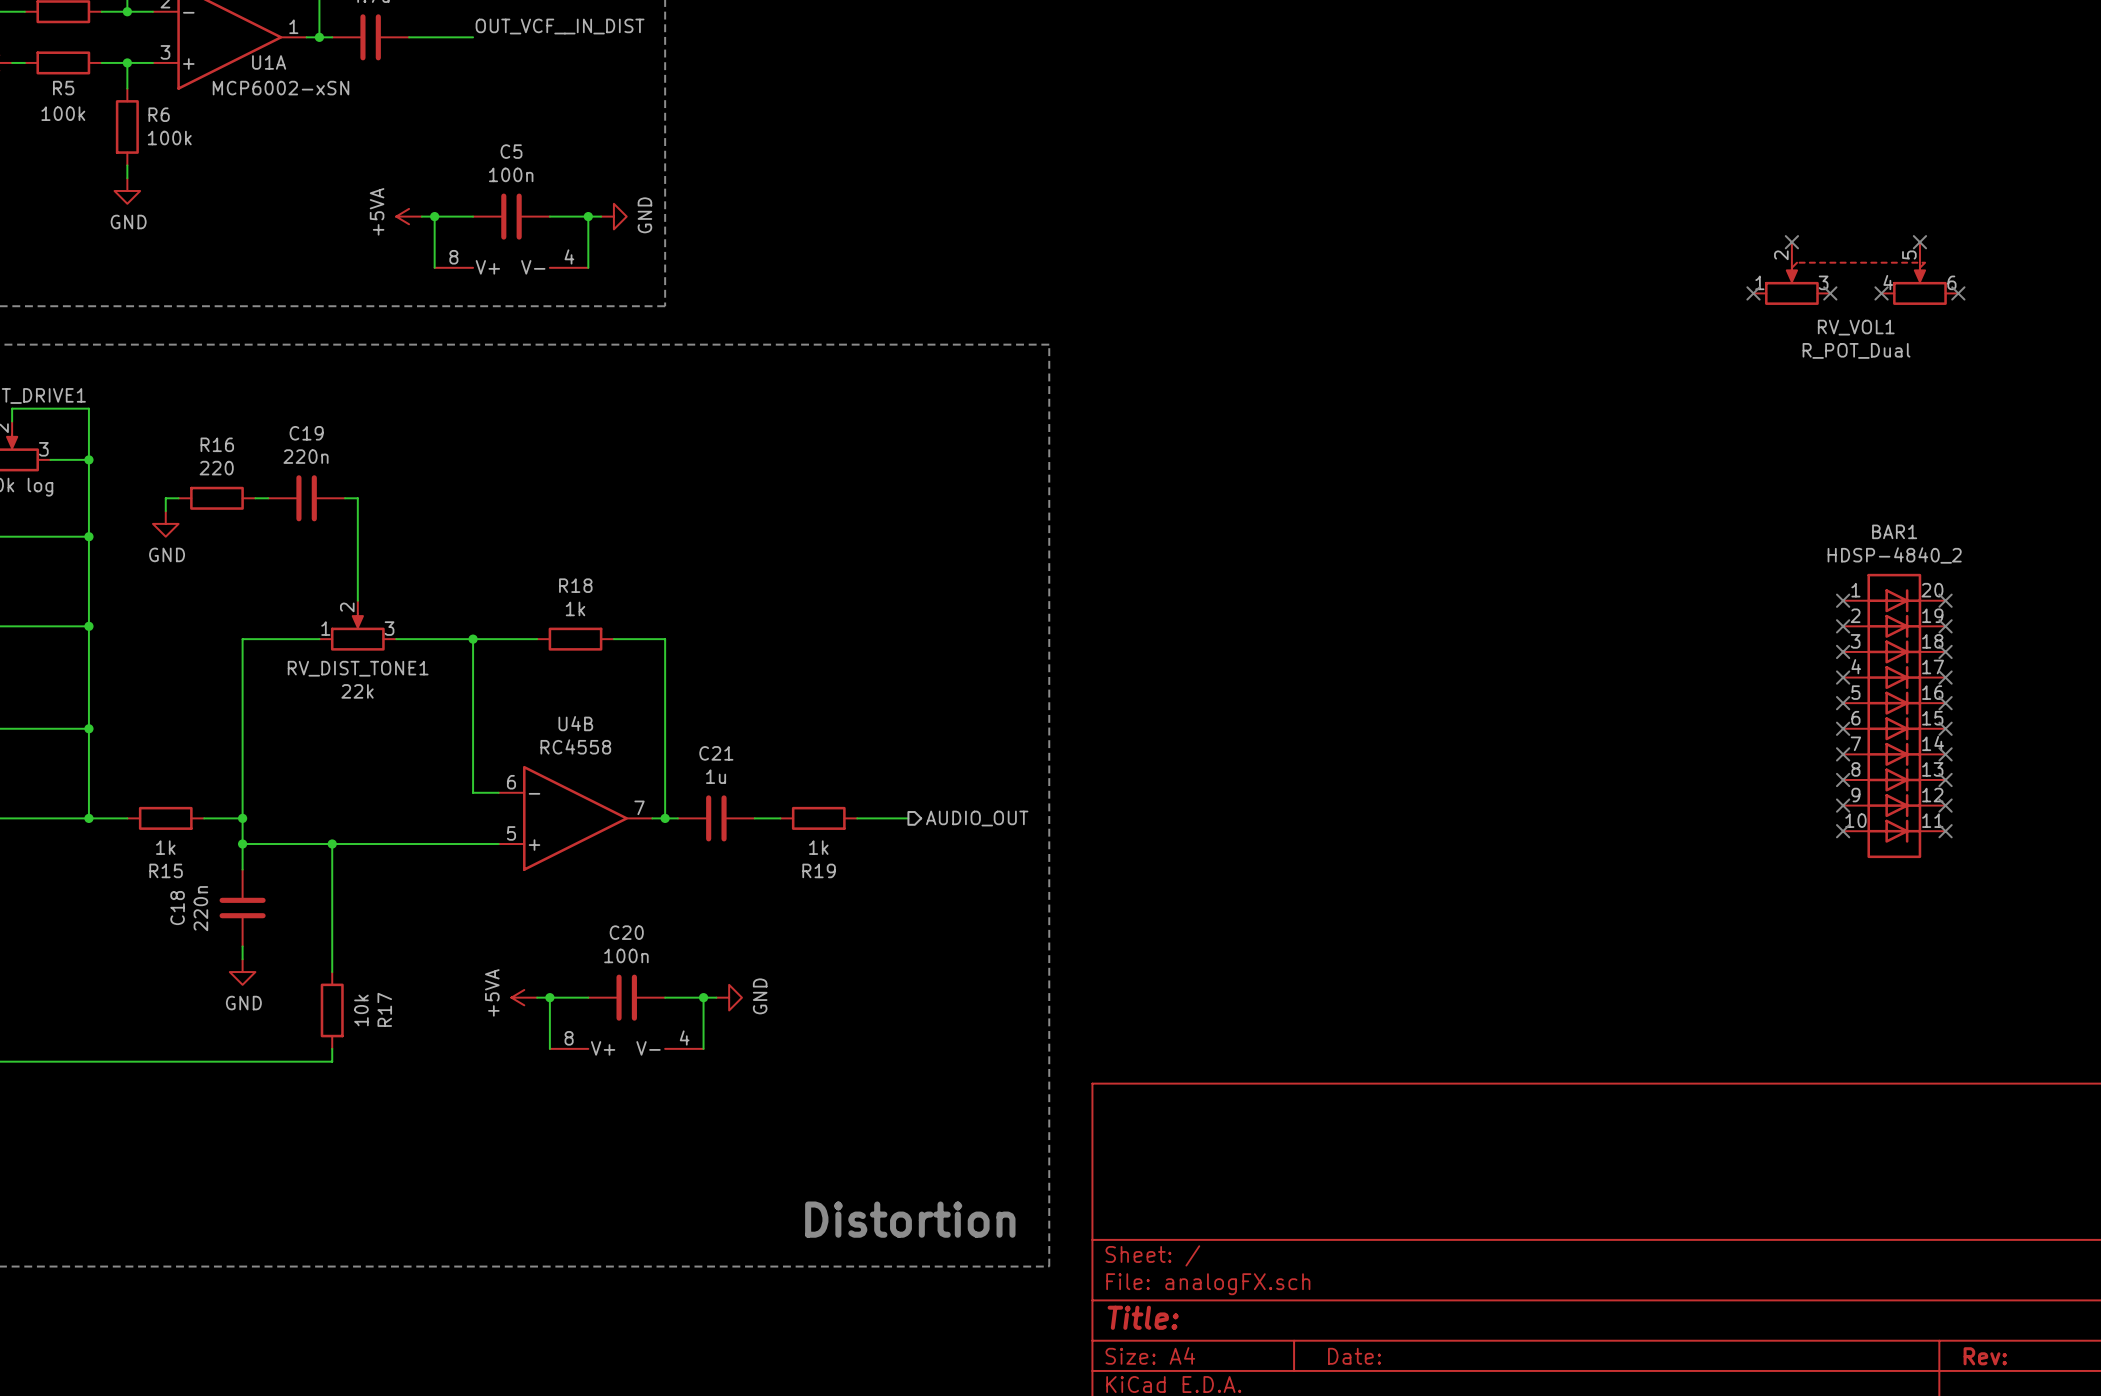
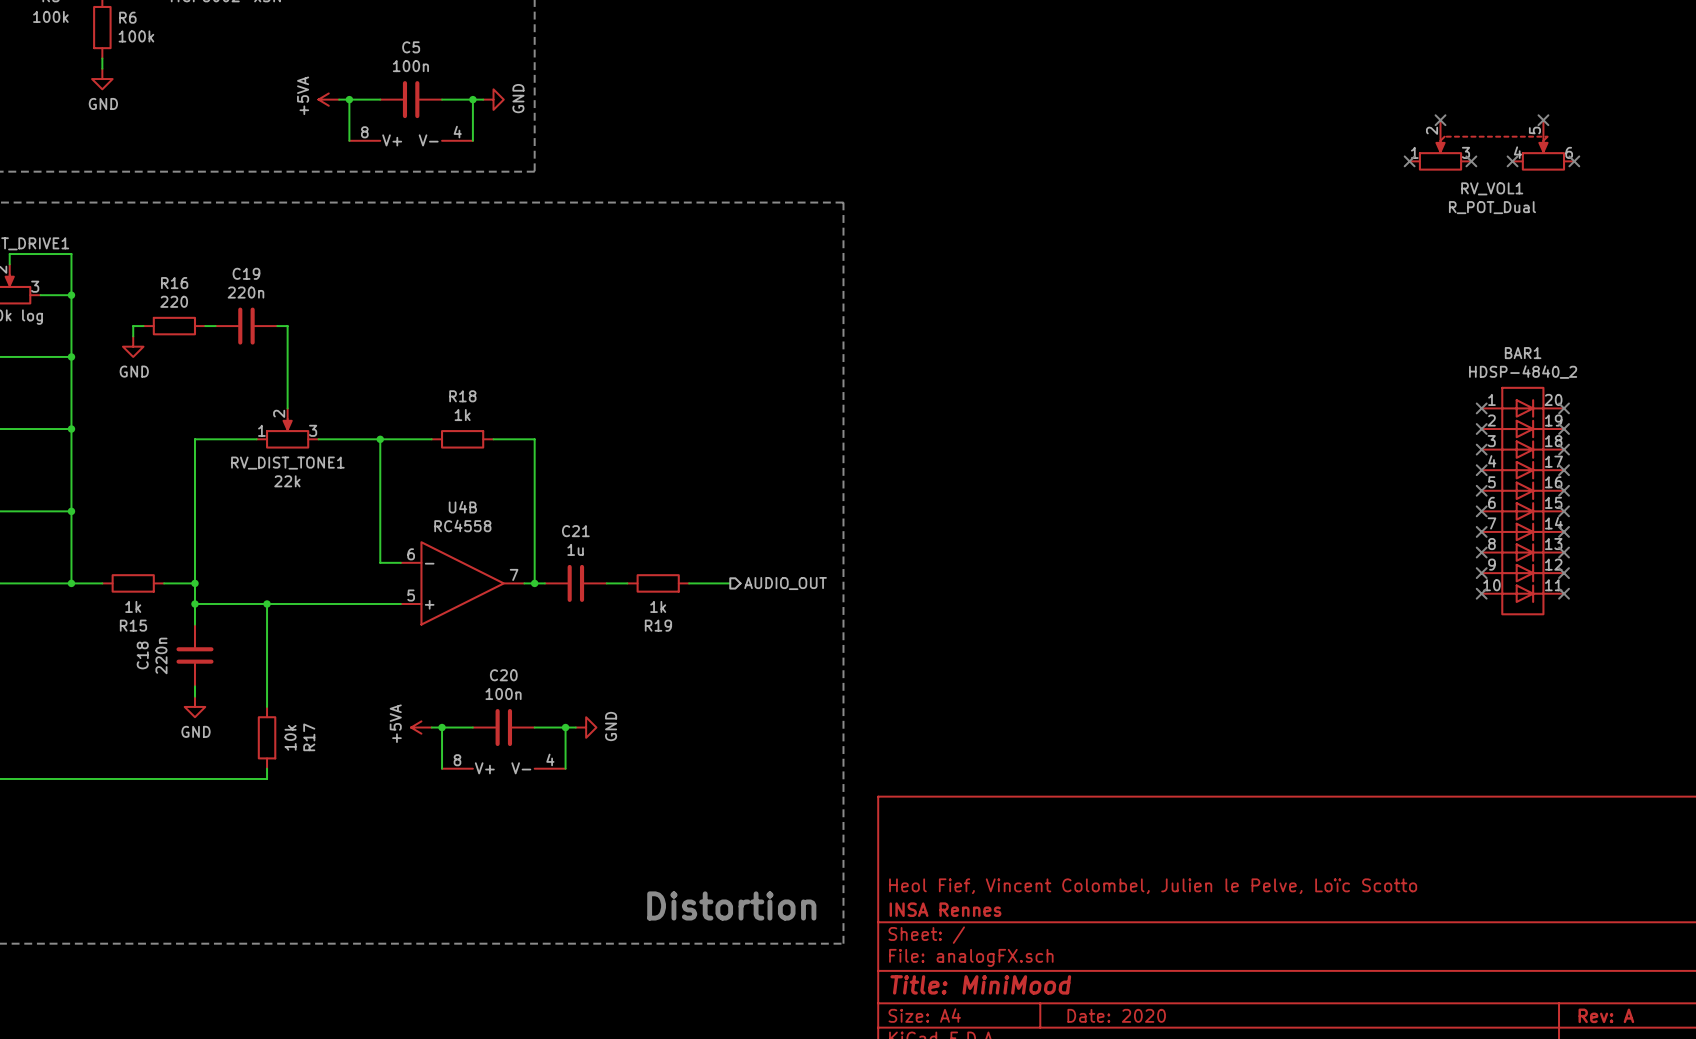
title block: none -> Heol Fief, Vincent Colombel, Julien le Pelve, Loïc Scotto (1153, 886)
title block: none -> INSA Rennes (945, 909)
title block: Title: (1143, 1317) -> Title: MiniMood (980, 984)
title block: Date: (1354, 1356) -> Date: 2020 (1116, 1015)
title block: Rev: (1985, 1356) -> Rev: A (1606, 1015)

